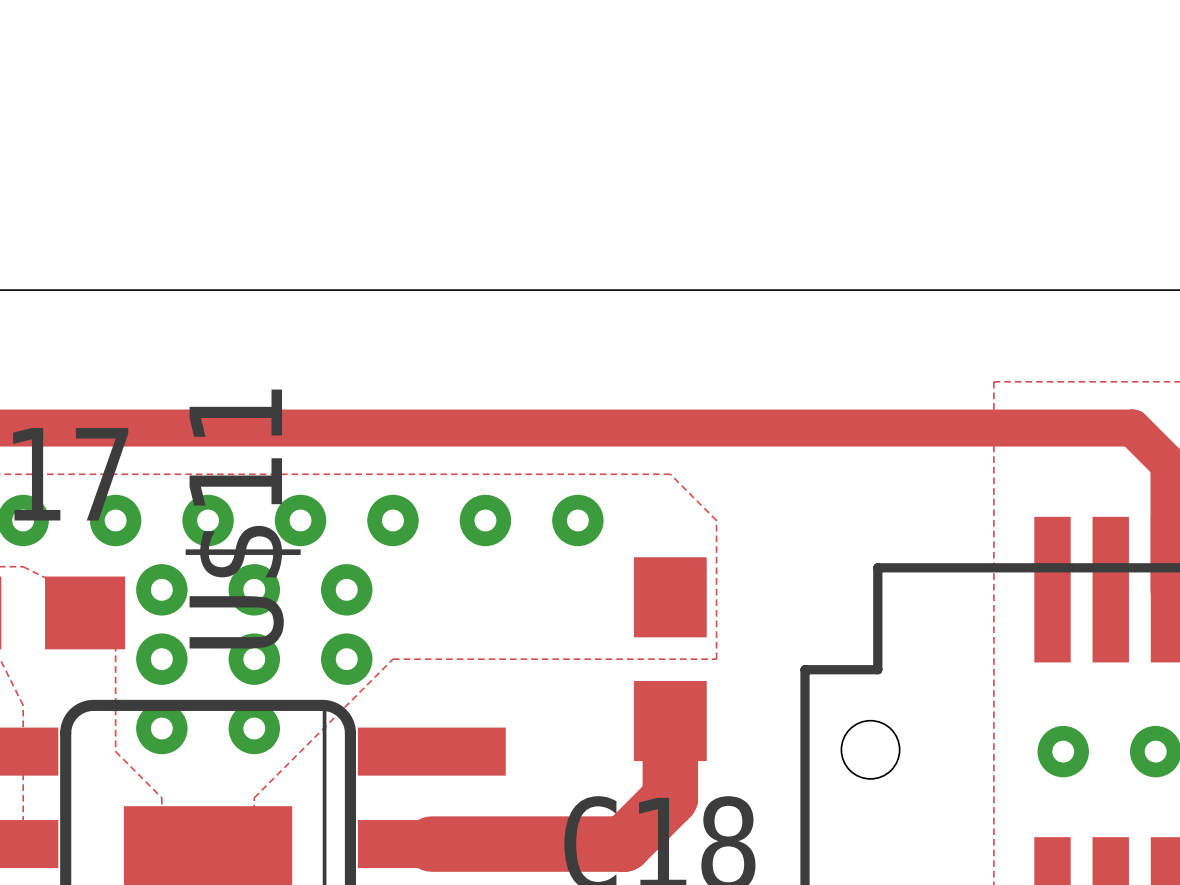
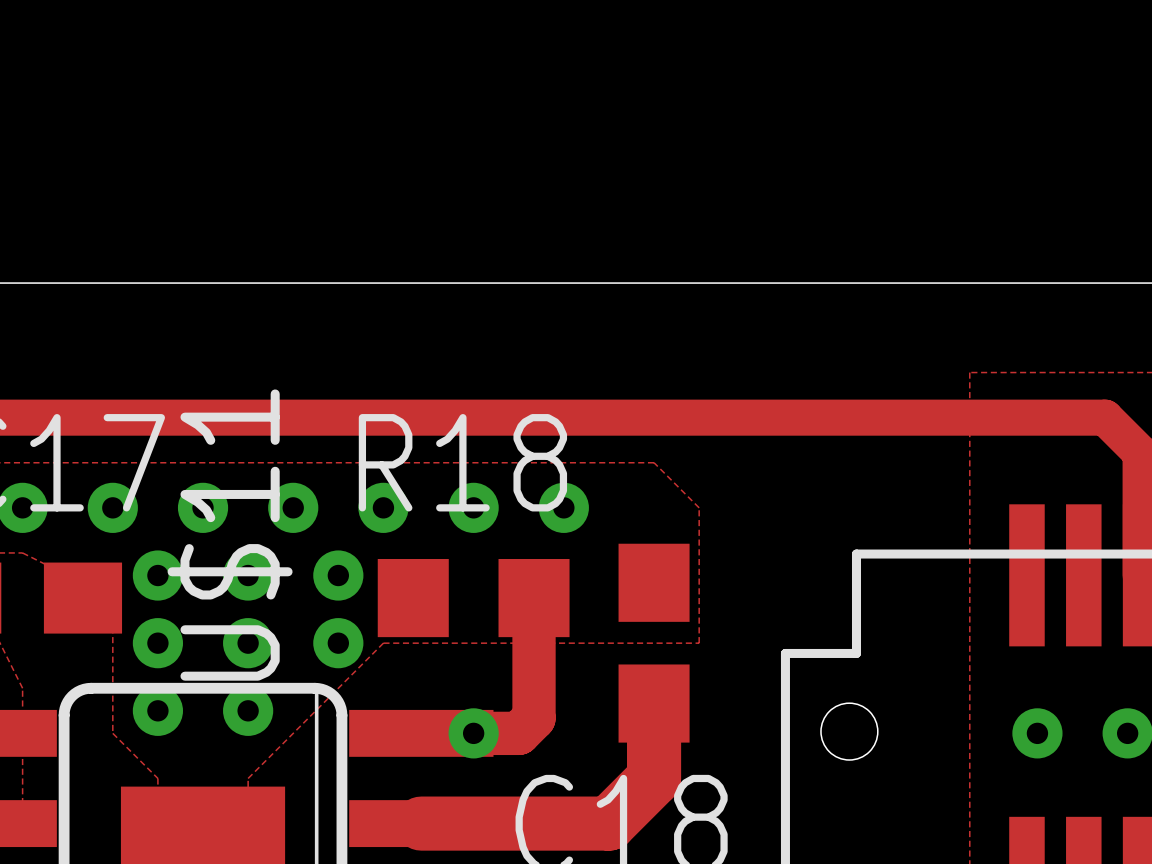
R18: none -> (473, 598)
track: none -> (534, 598) (534, 718) (518, 733) (421, 733)
via: none -> (473, 733)

